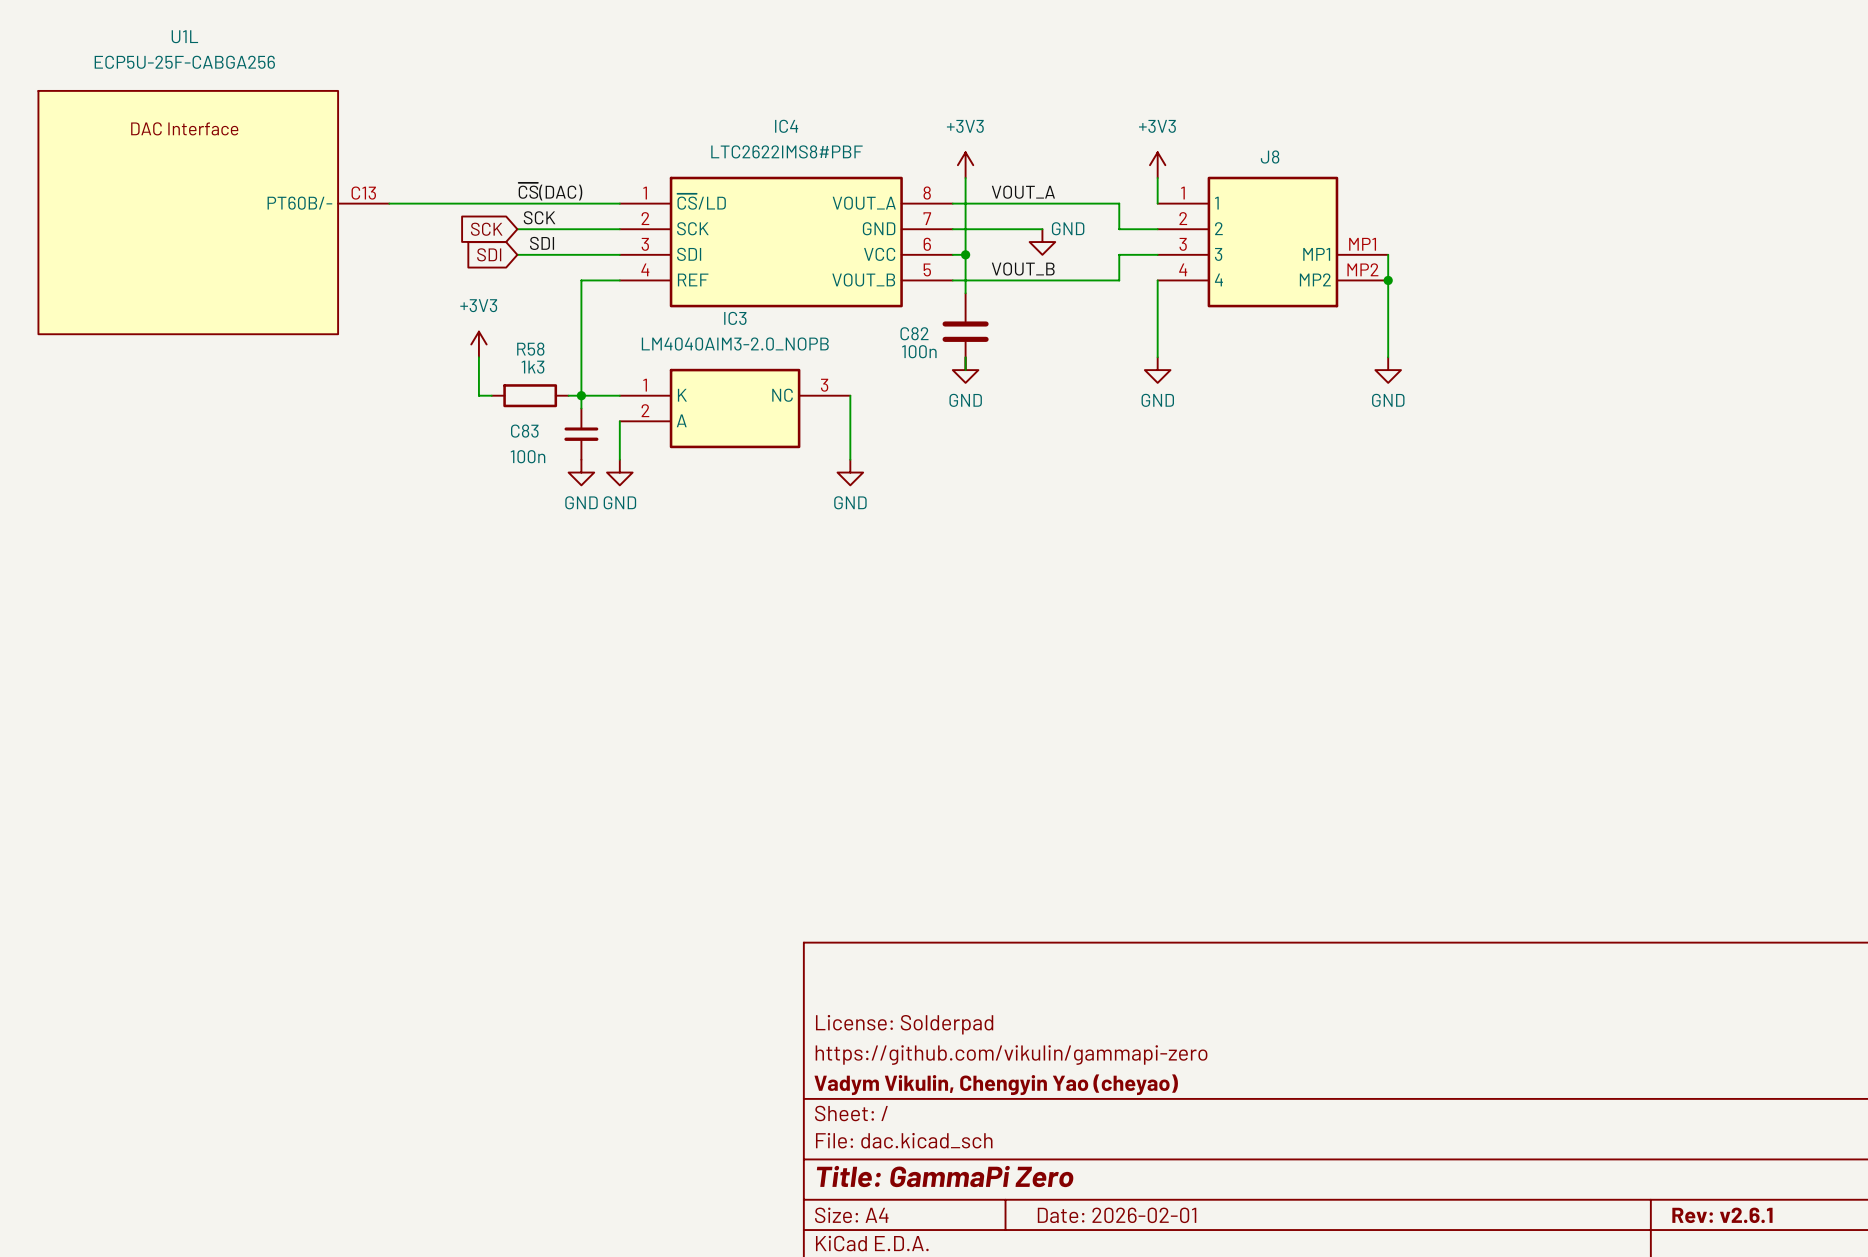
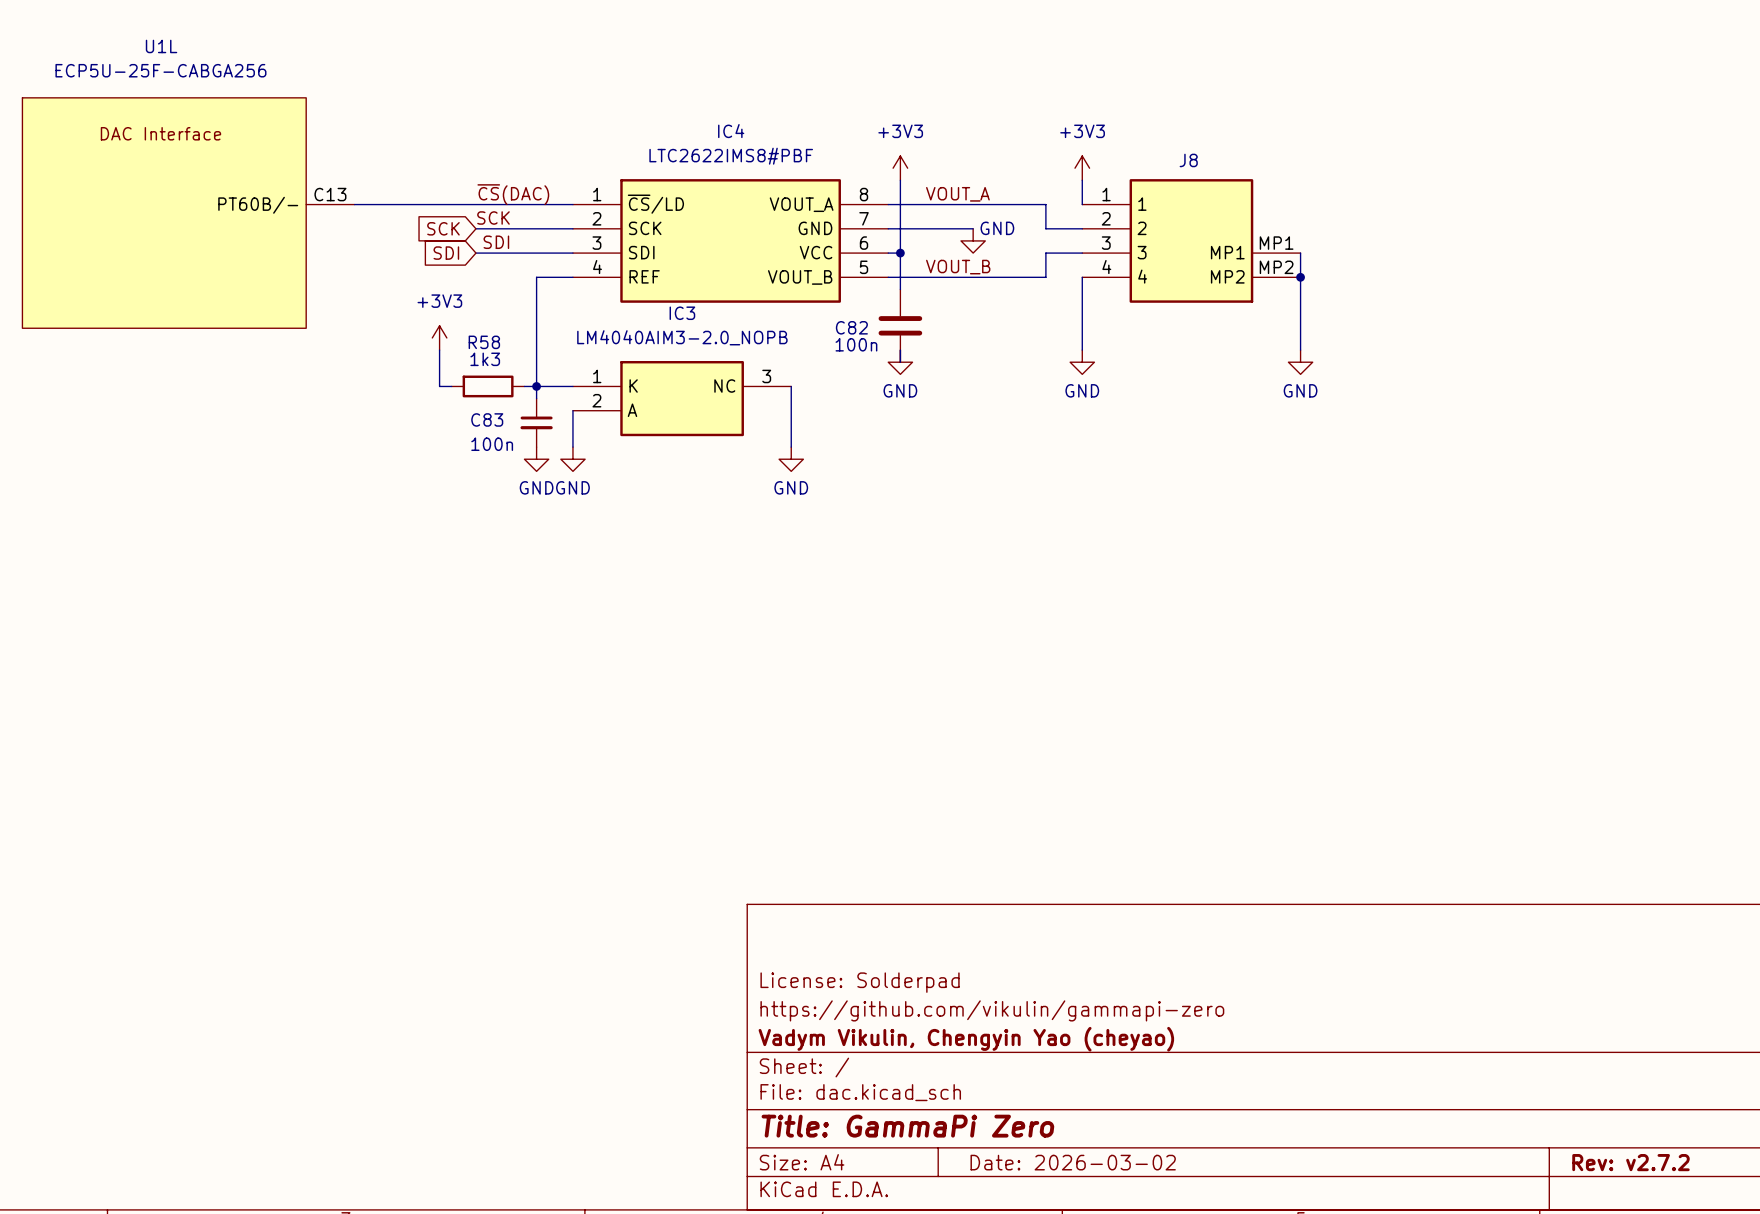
title block: Date: 2026-02-01 (1117, 1215) -> Date: 2026-03-02 (1073, 1162)
title block: Rev: v2.6.1 (1722, 1215) -> Rev: v2.7.2 (1630, 1162)

